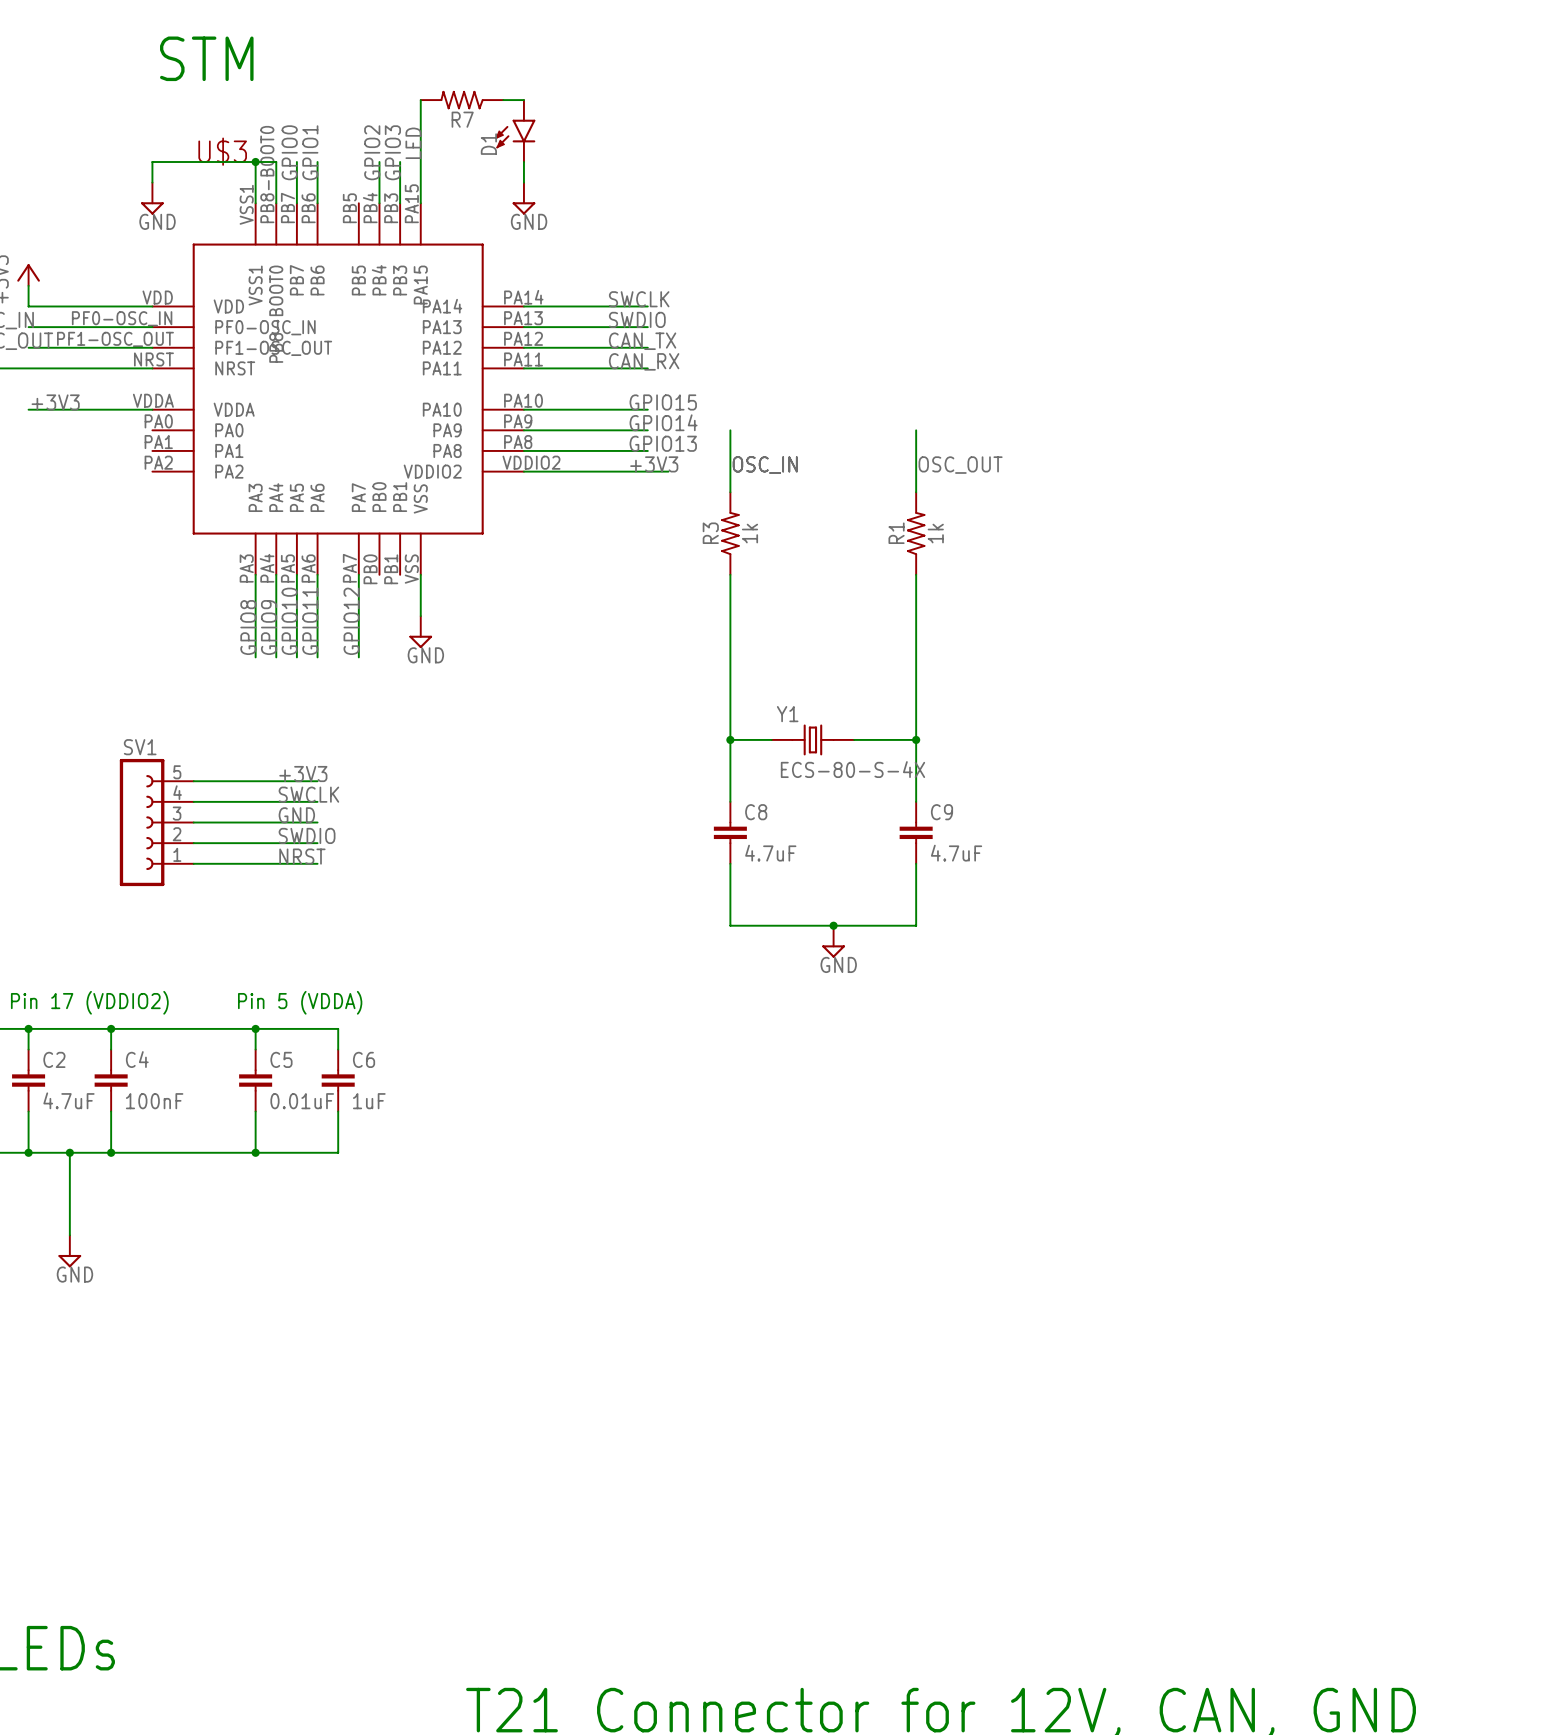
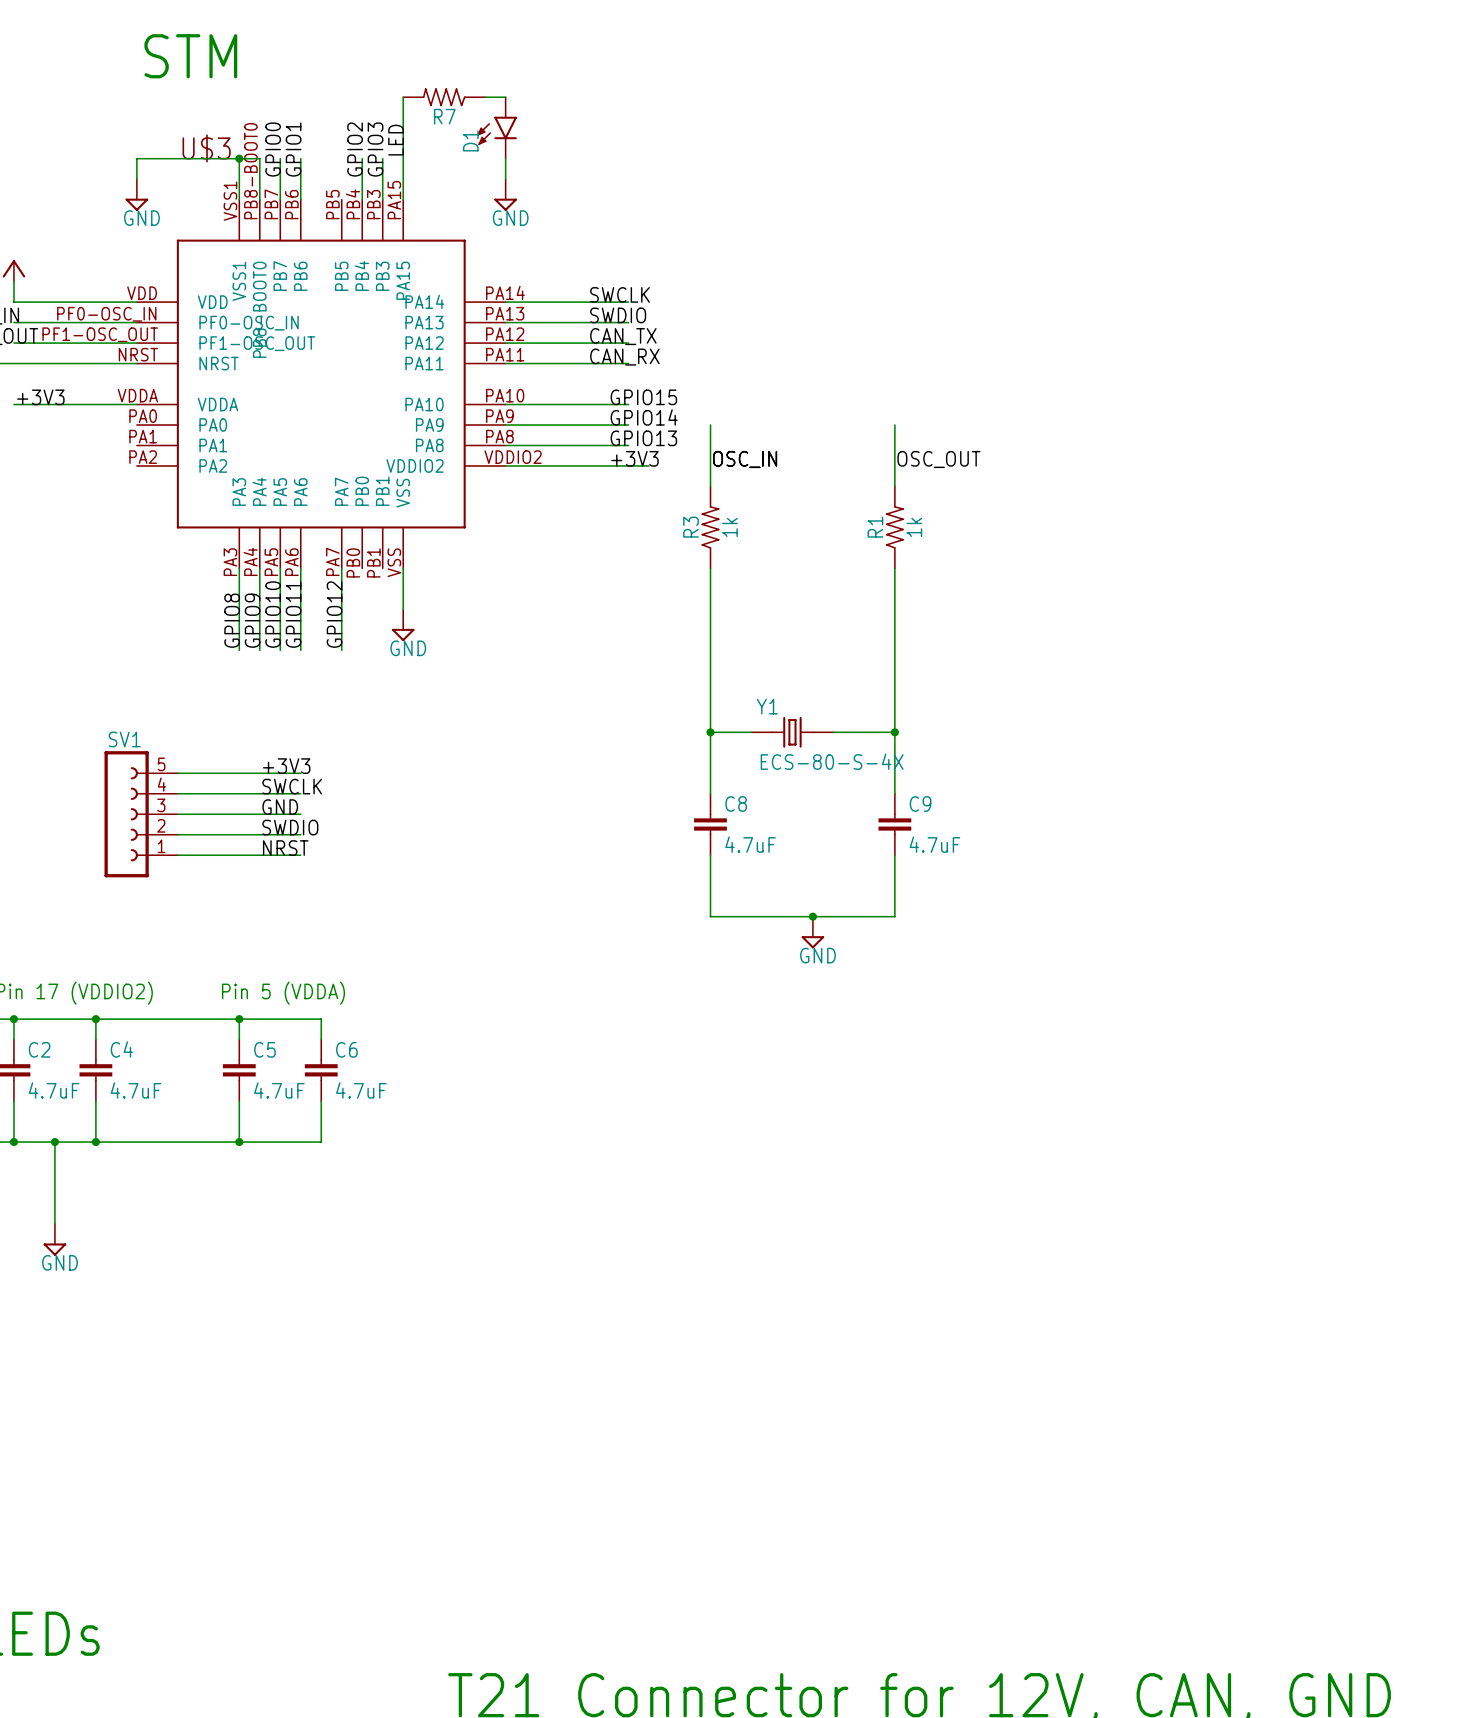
C4 value: 100nF (154, 1101) -> 4.7uF (135, 1090)
C5 value: 0.01uF (302, 1101) -> 4.7uF (279, 1090)
C6 value: 1uF (369, 1101) -> 4.7uF (361, 1090)

